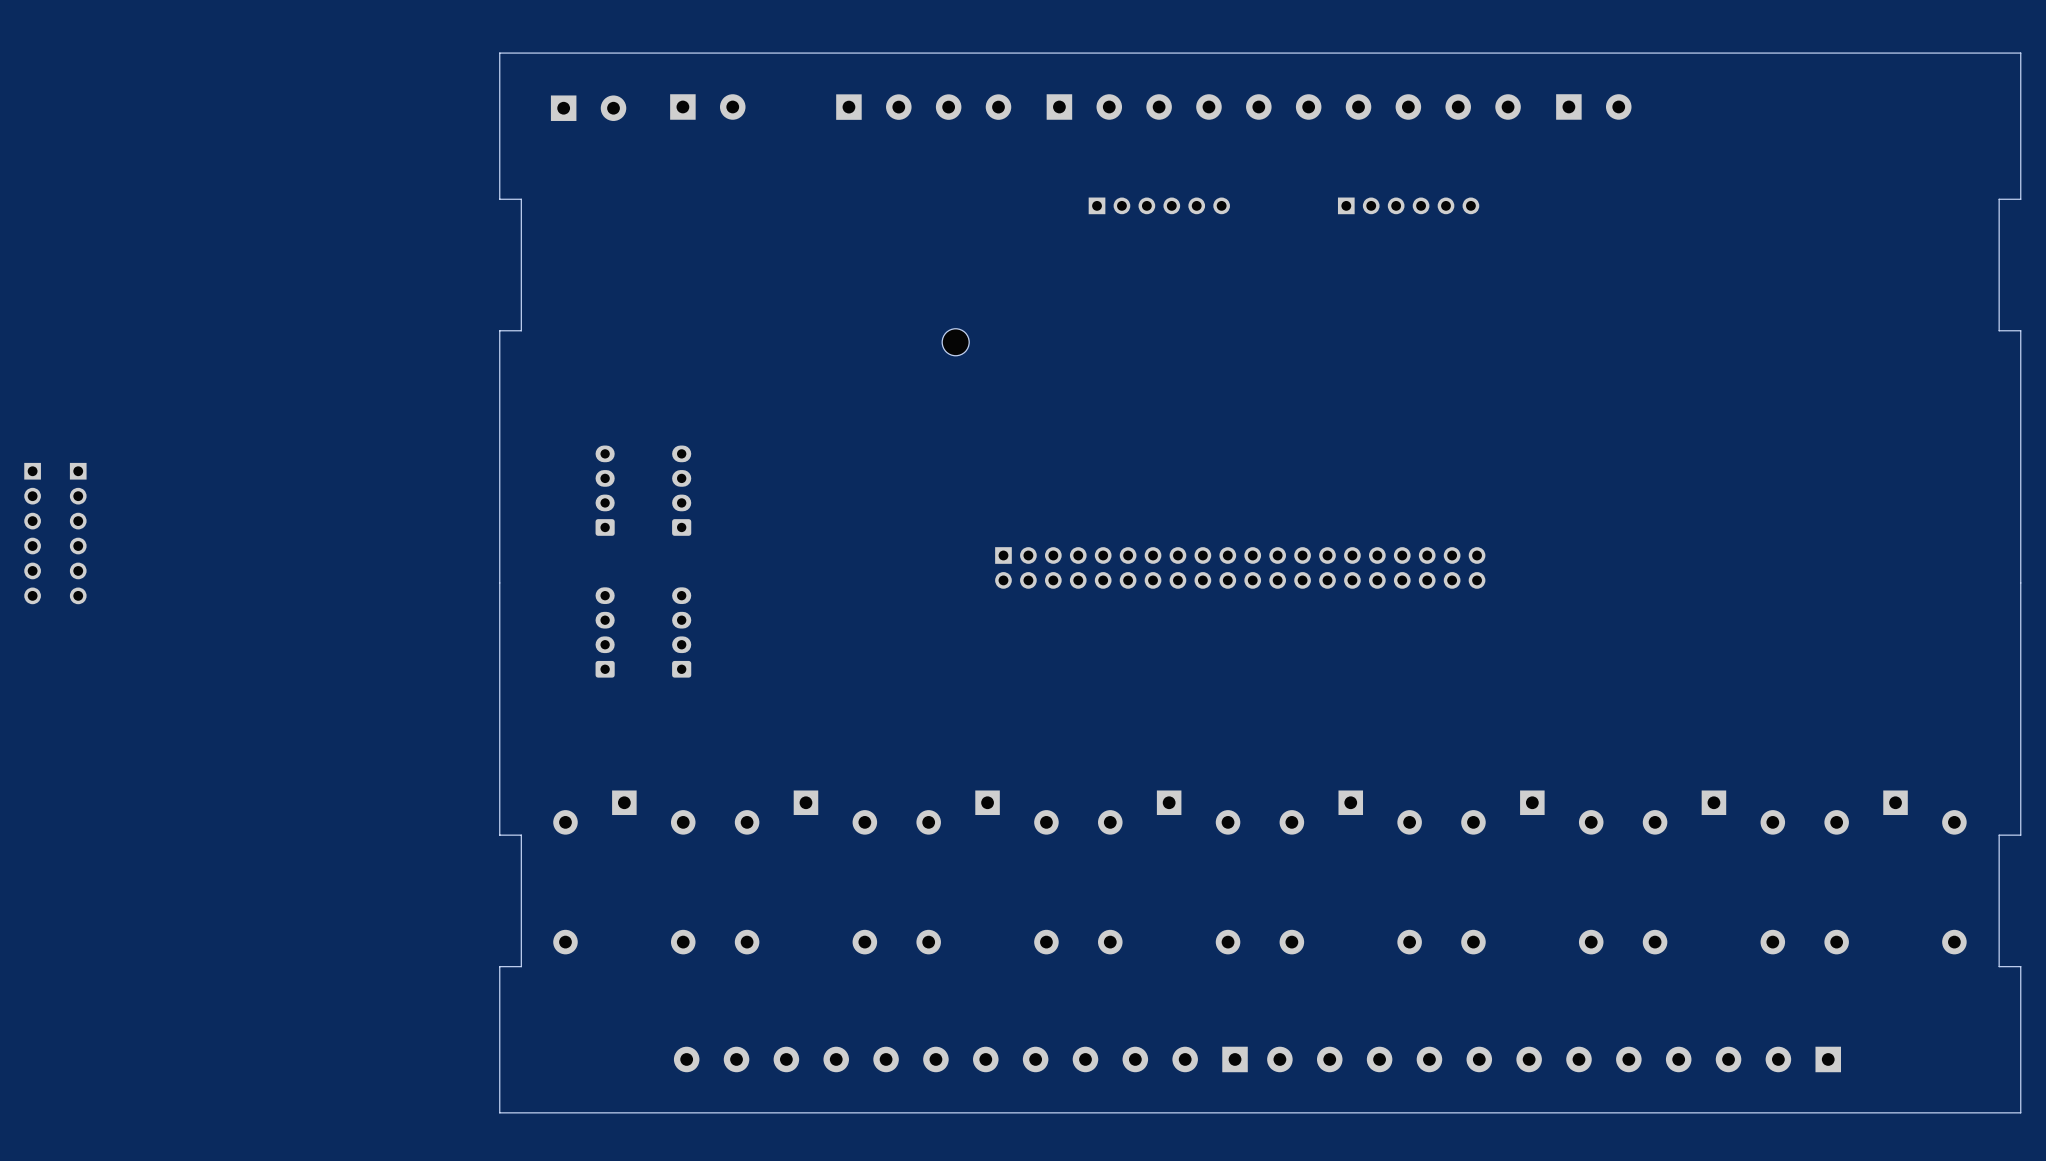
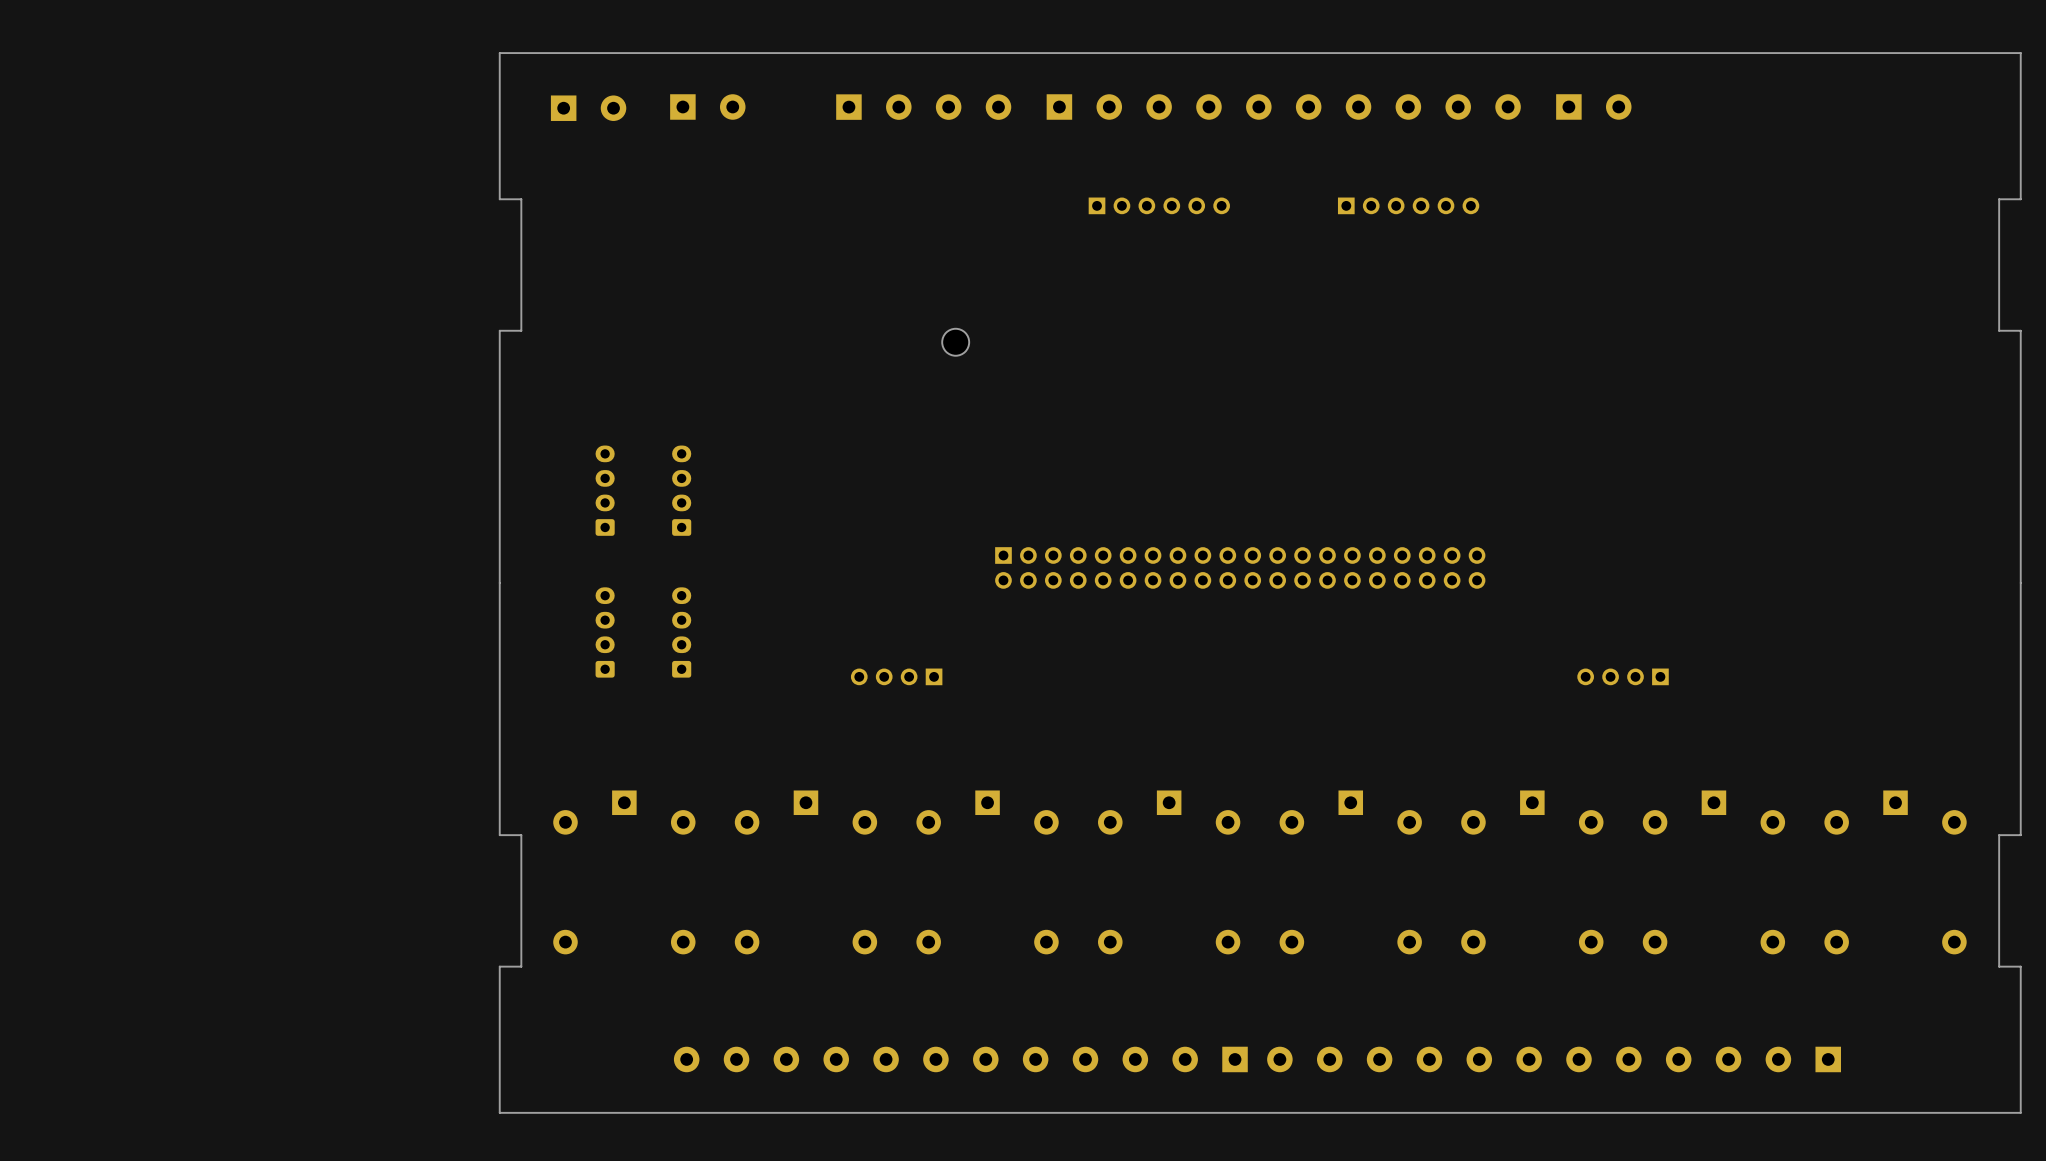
part: (32, 533) -> none
part: (78, 533) -> none
part: none -> (896, 676)
part: none -> (1623, 676)

